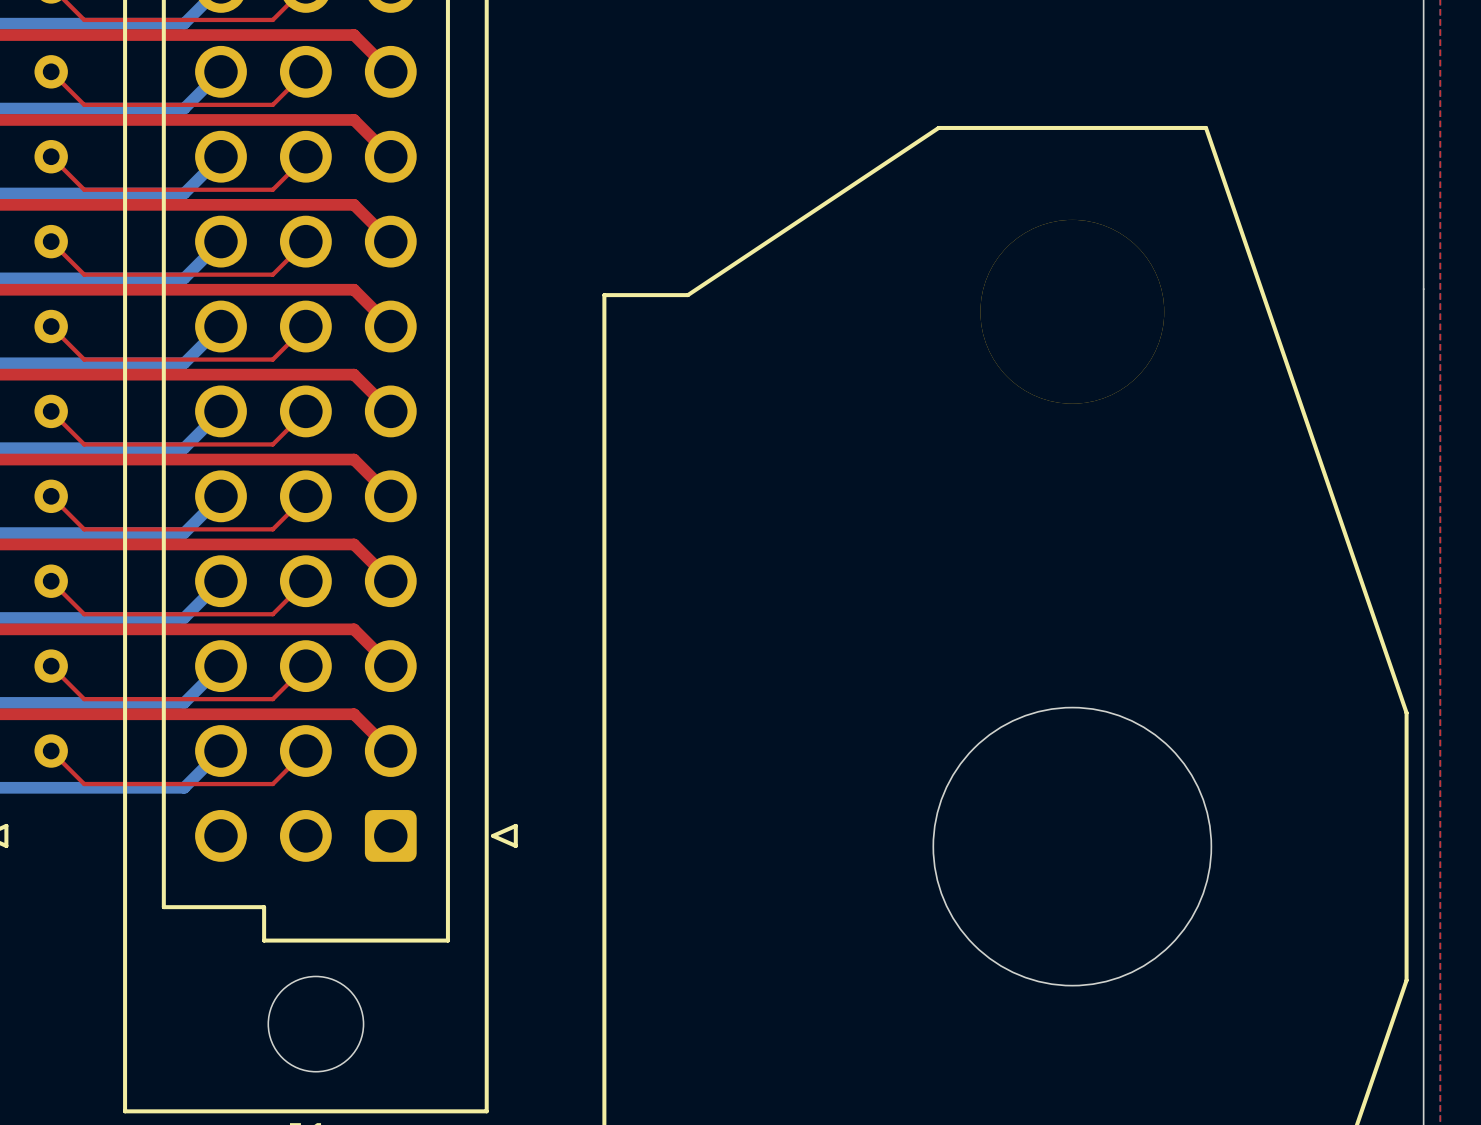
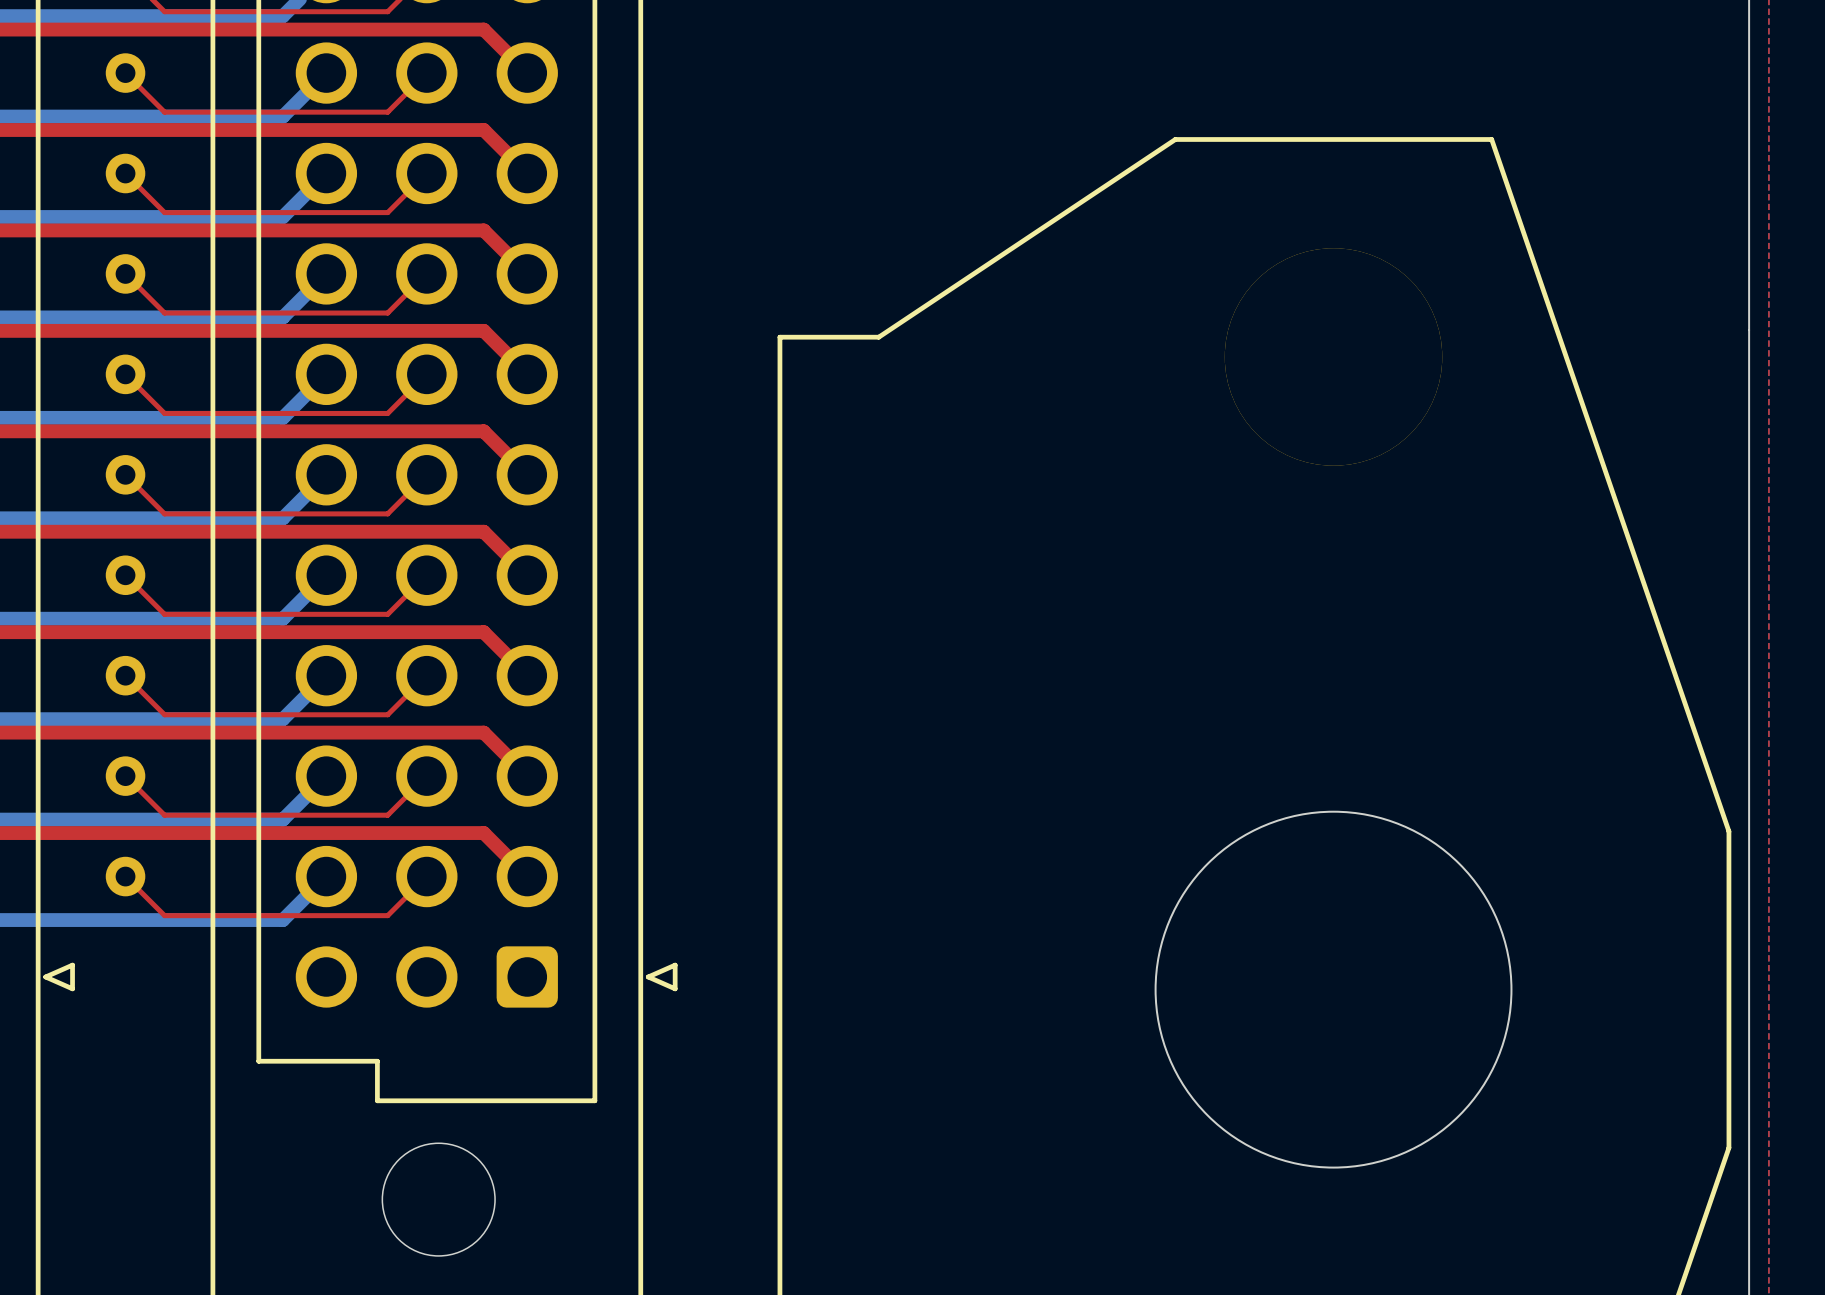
round board edge size: [932, 706, 1213, 987] -> [1154, 810, 1513, 1169]

